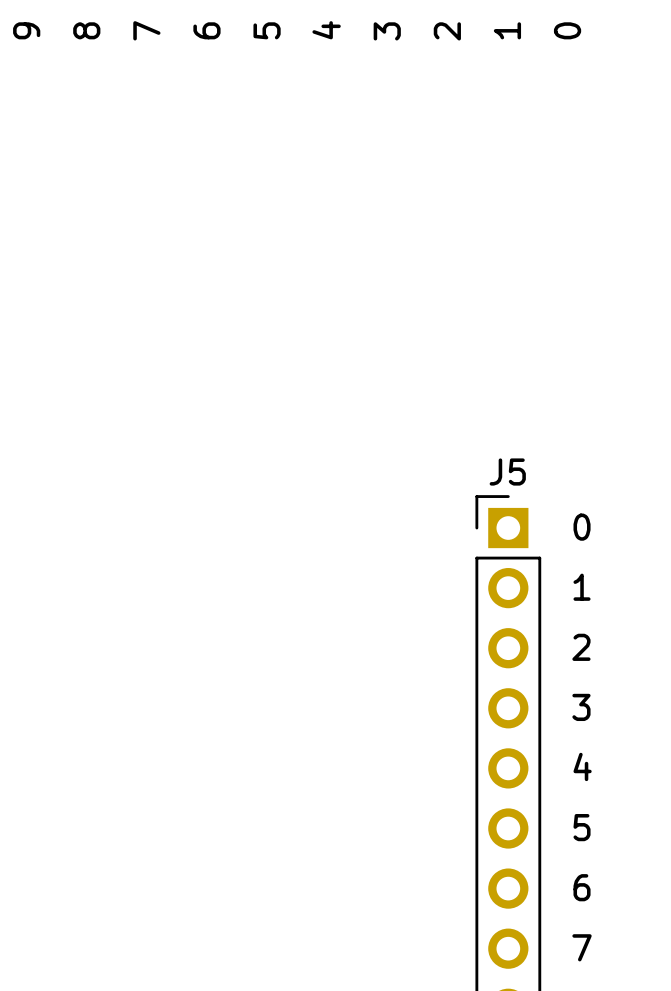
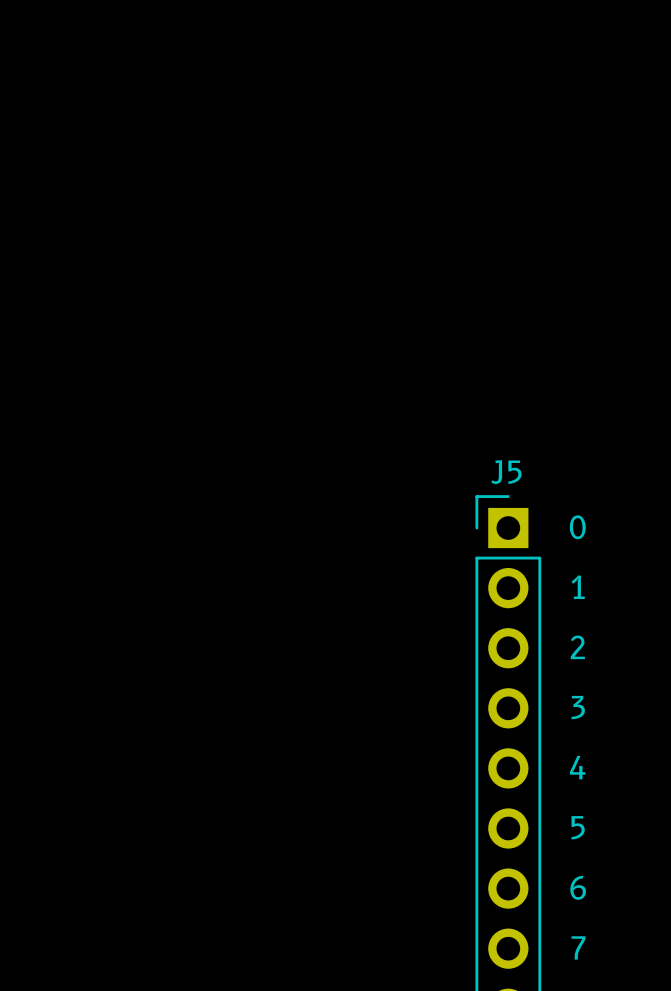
text: 9 (26, 30) -> none
text: 8 (86, 30) -> none
text: 7 (146, 30) -> none
text: 6 (206, 30) -> none
text: 5 (267, 30) -> none
text: 4 (326, 30) -> none
text: 1 (507, 30) -> none
text: 0 (567, 30) -> none
text: 3 (387, 31) -> none
text: 2 (447, 31) -> none

